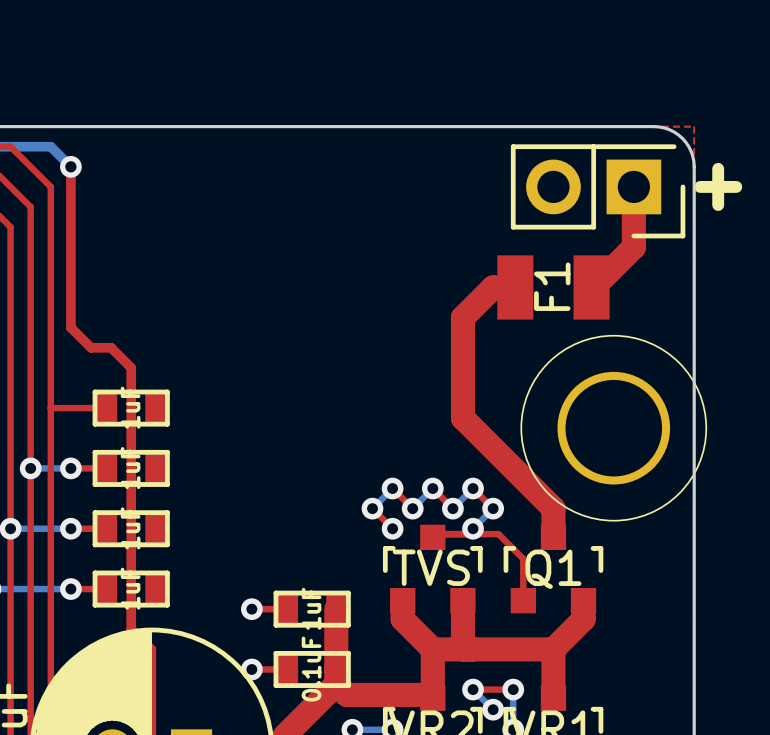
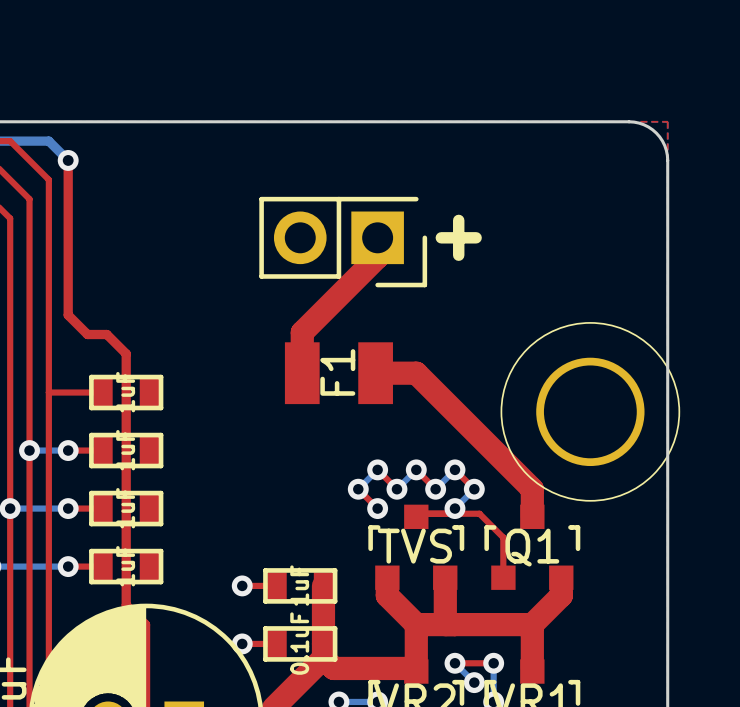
top track: (633, 186) (633, 247) (591, 287) -> none
part position: (598, 191) -> (343, 242)
top track: none -> (377, 237) (377, 257) (302, 332) (302, 373)
top track: (515, 287) (493, 287) (462, 317) (462, 418) -> (375, 373) (416, 373) (445, 402)
F1 position: (553, 287) -> (338, 373)

